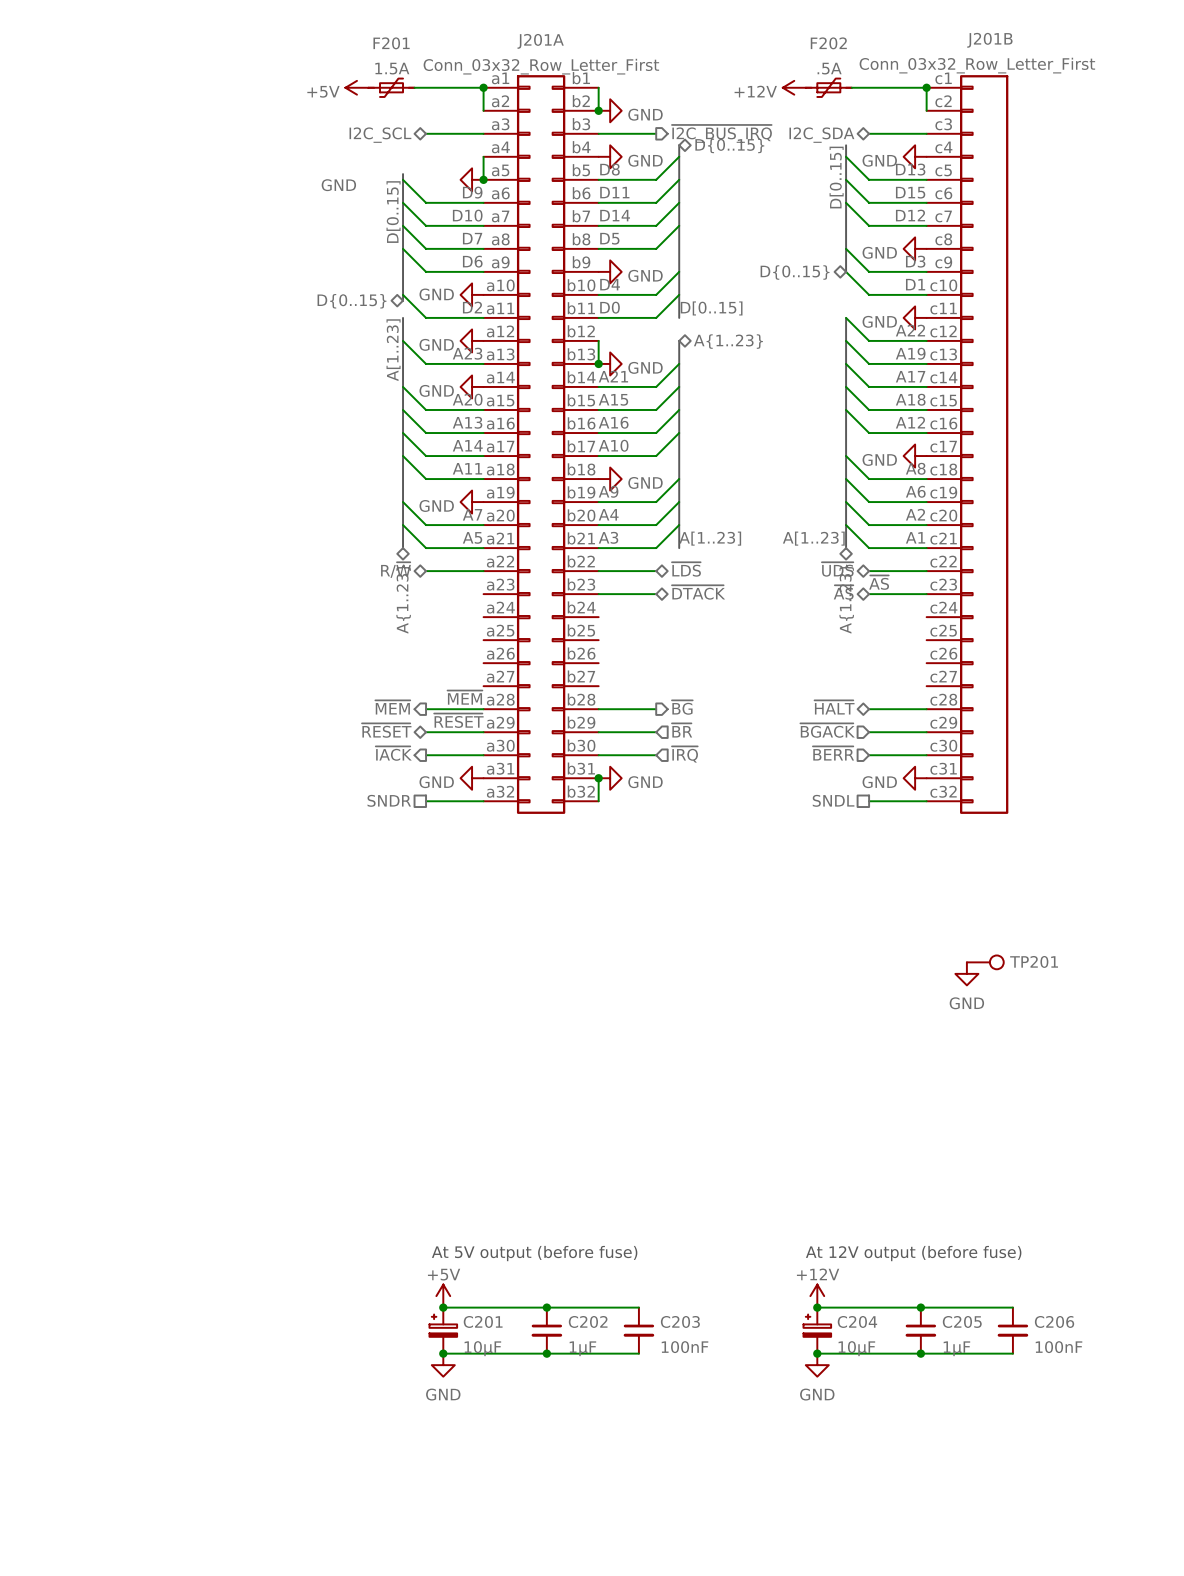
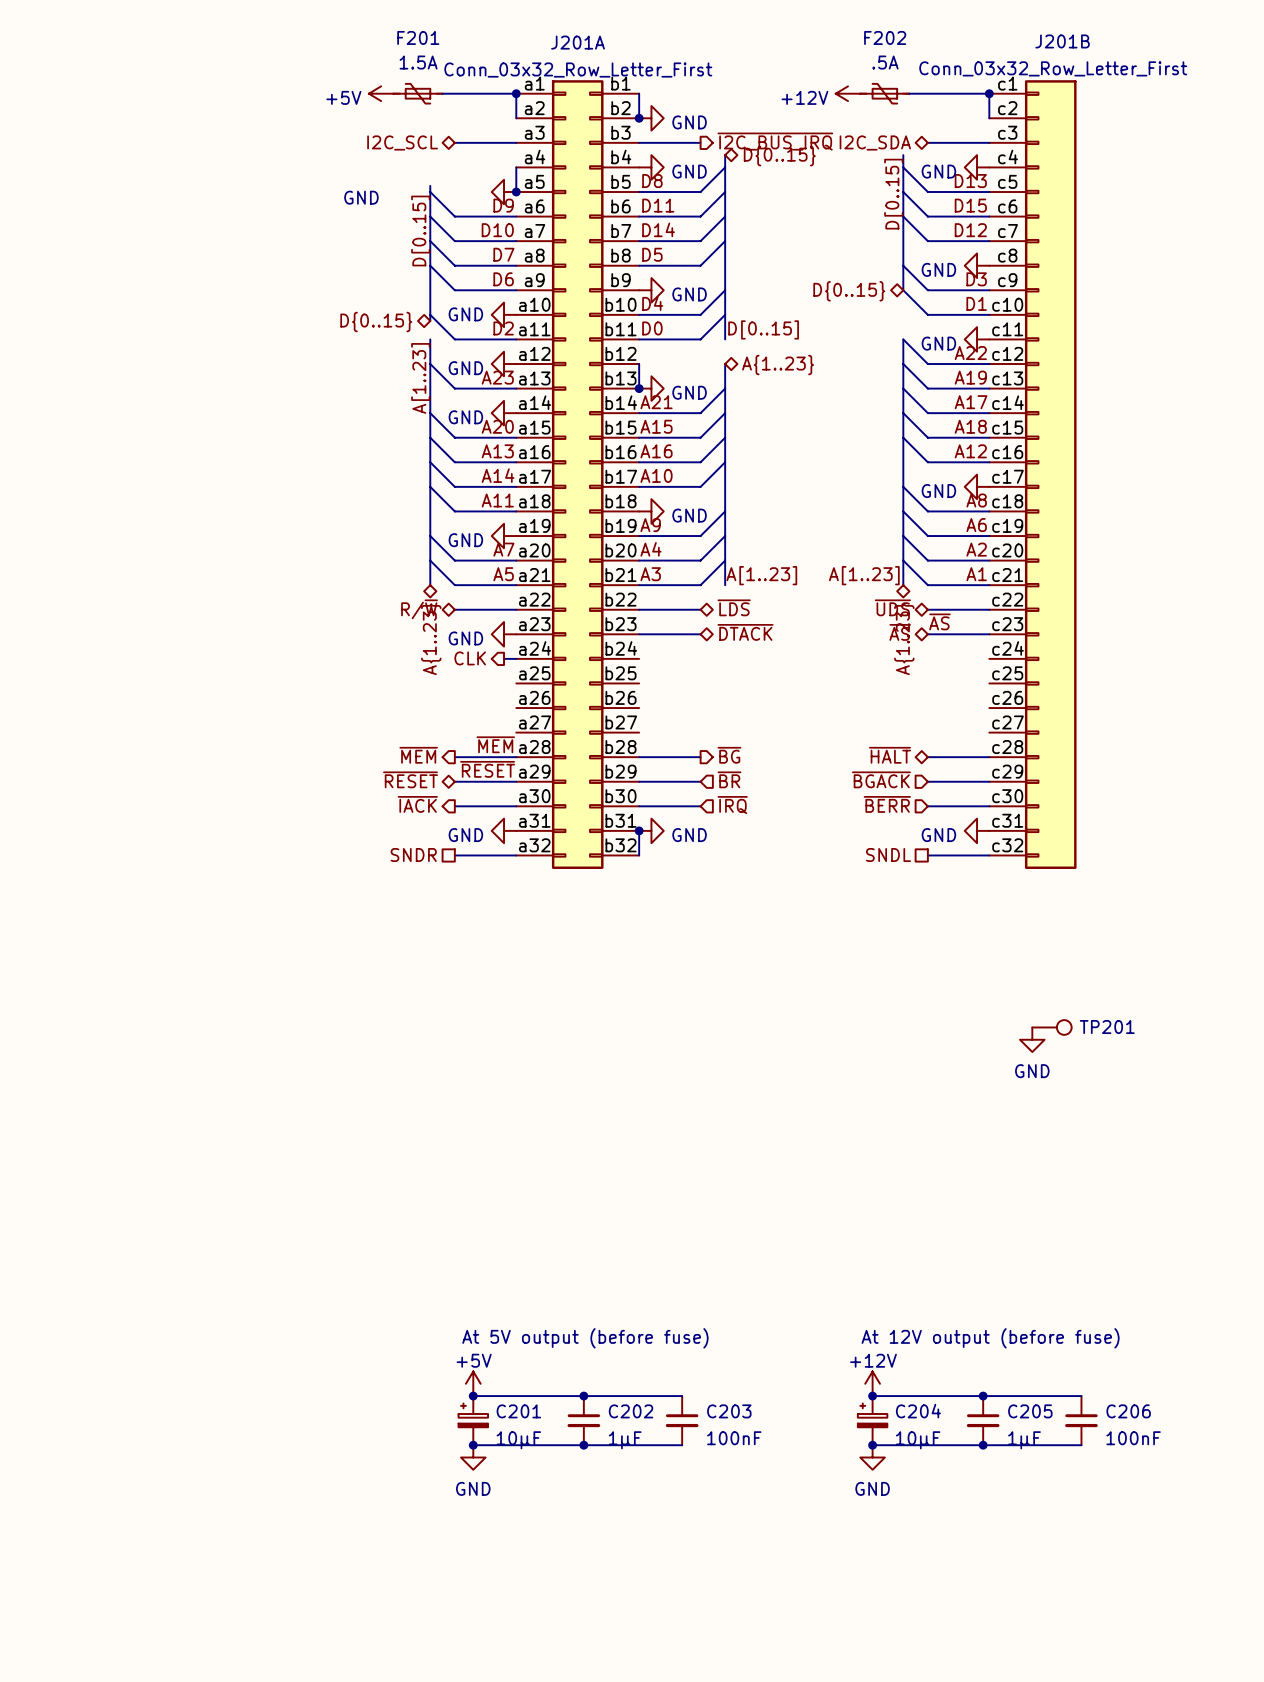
F201 flip: as is (391, 87) -> left-right (418, 93)
F202 flip: as is (828, 87) -> left-right (884, 93)
power symbol: none -> GND (504, 634)
hierarchical label: none -> CLK (470, 658)
wire: none -> (504, 658) (516, 658)

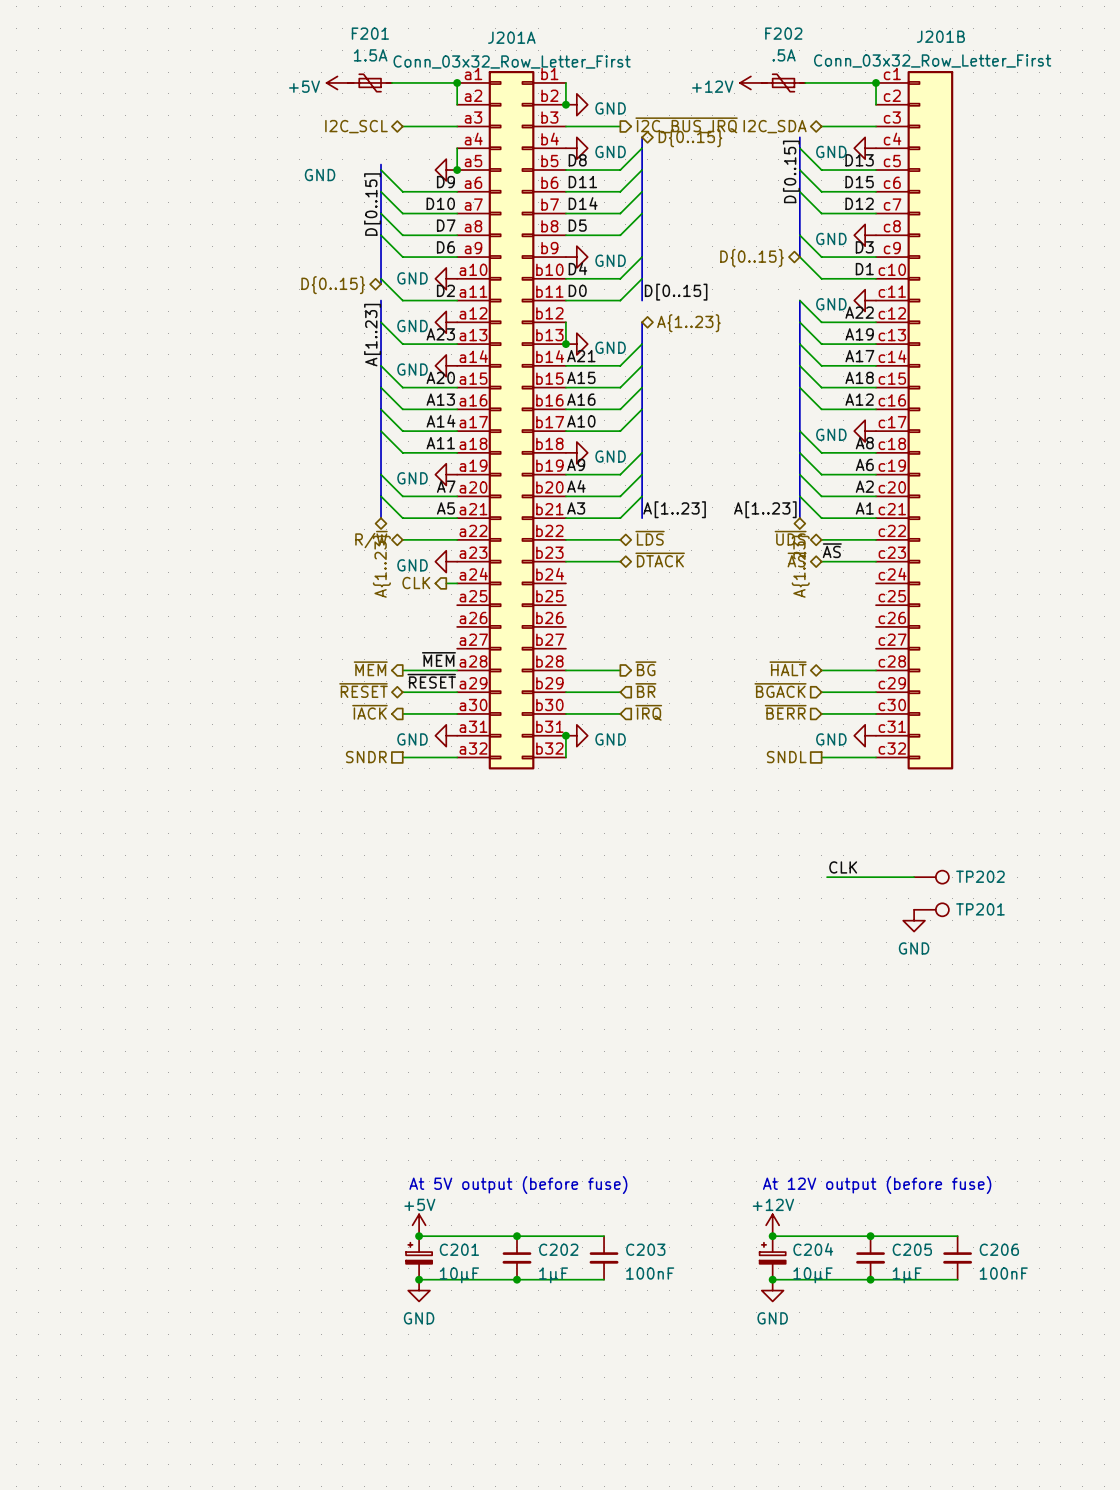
label: none -> CLK (843, 867)
wire: none -> (827, 877) (914, 877)
TP202: none -> (931, 877)

